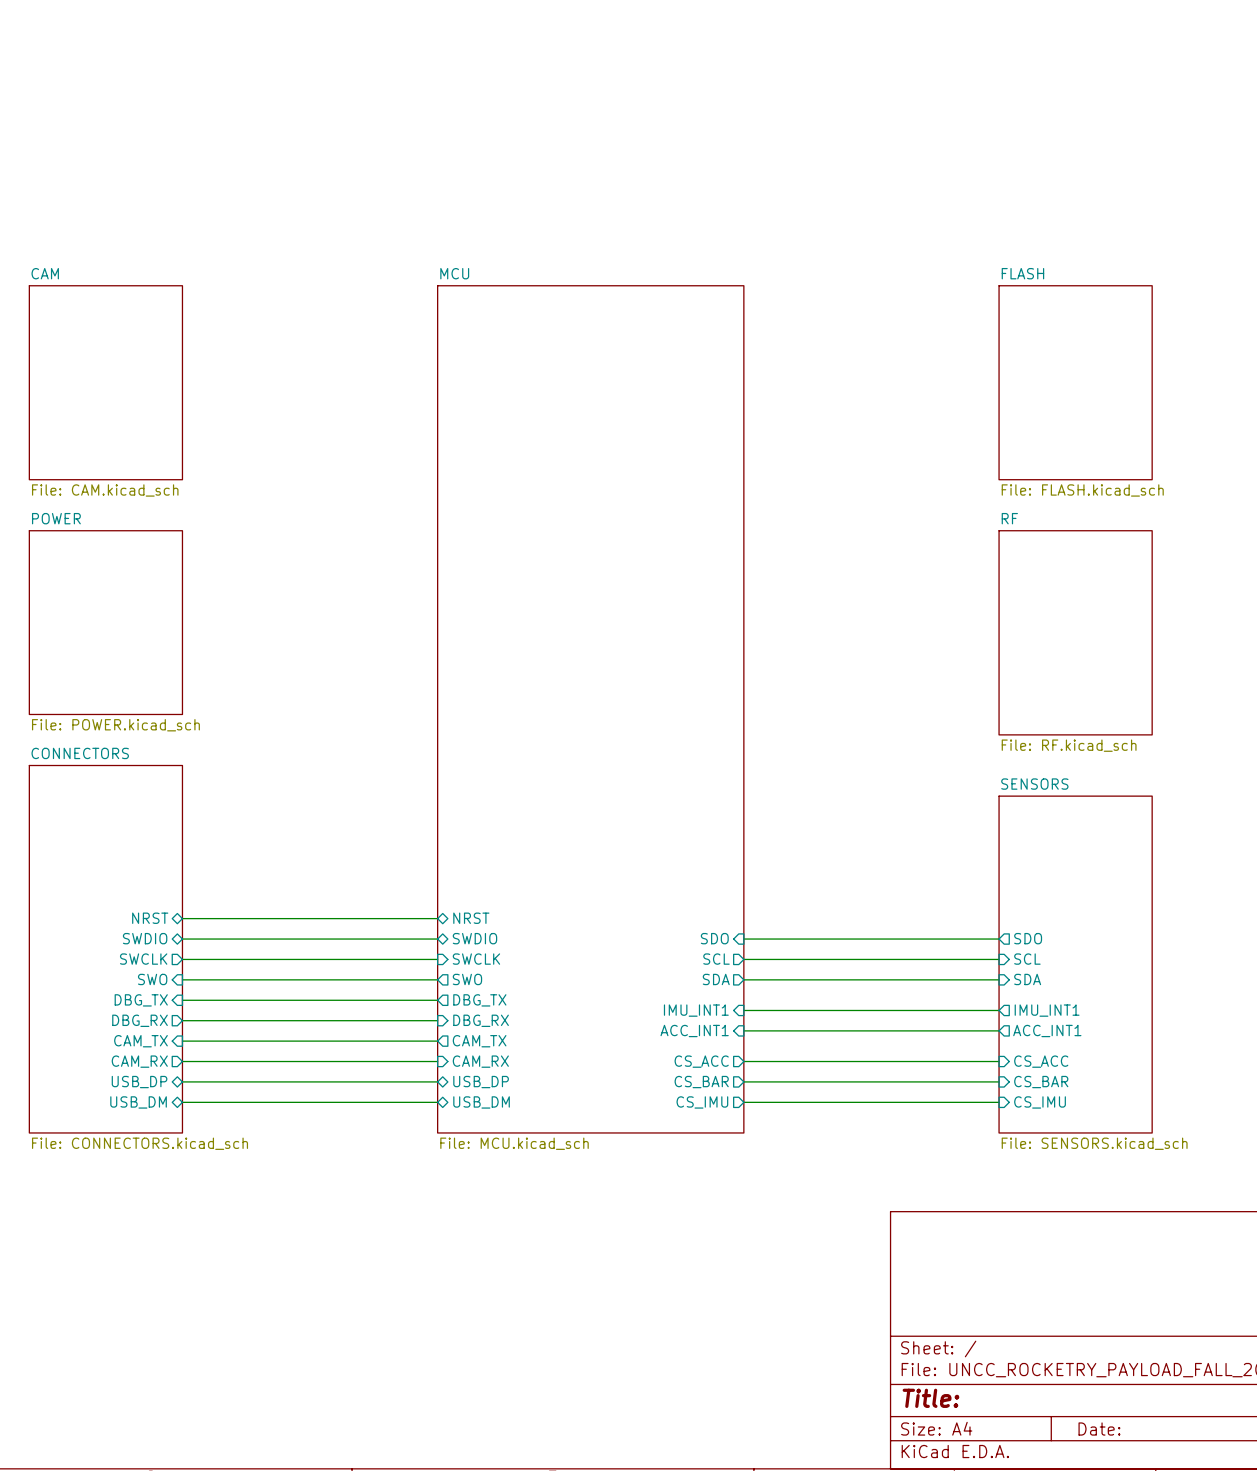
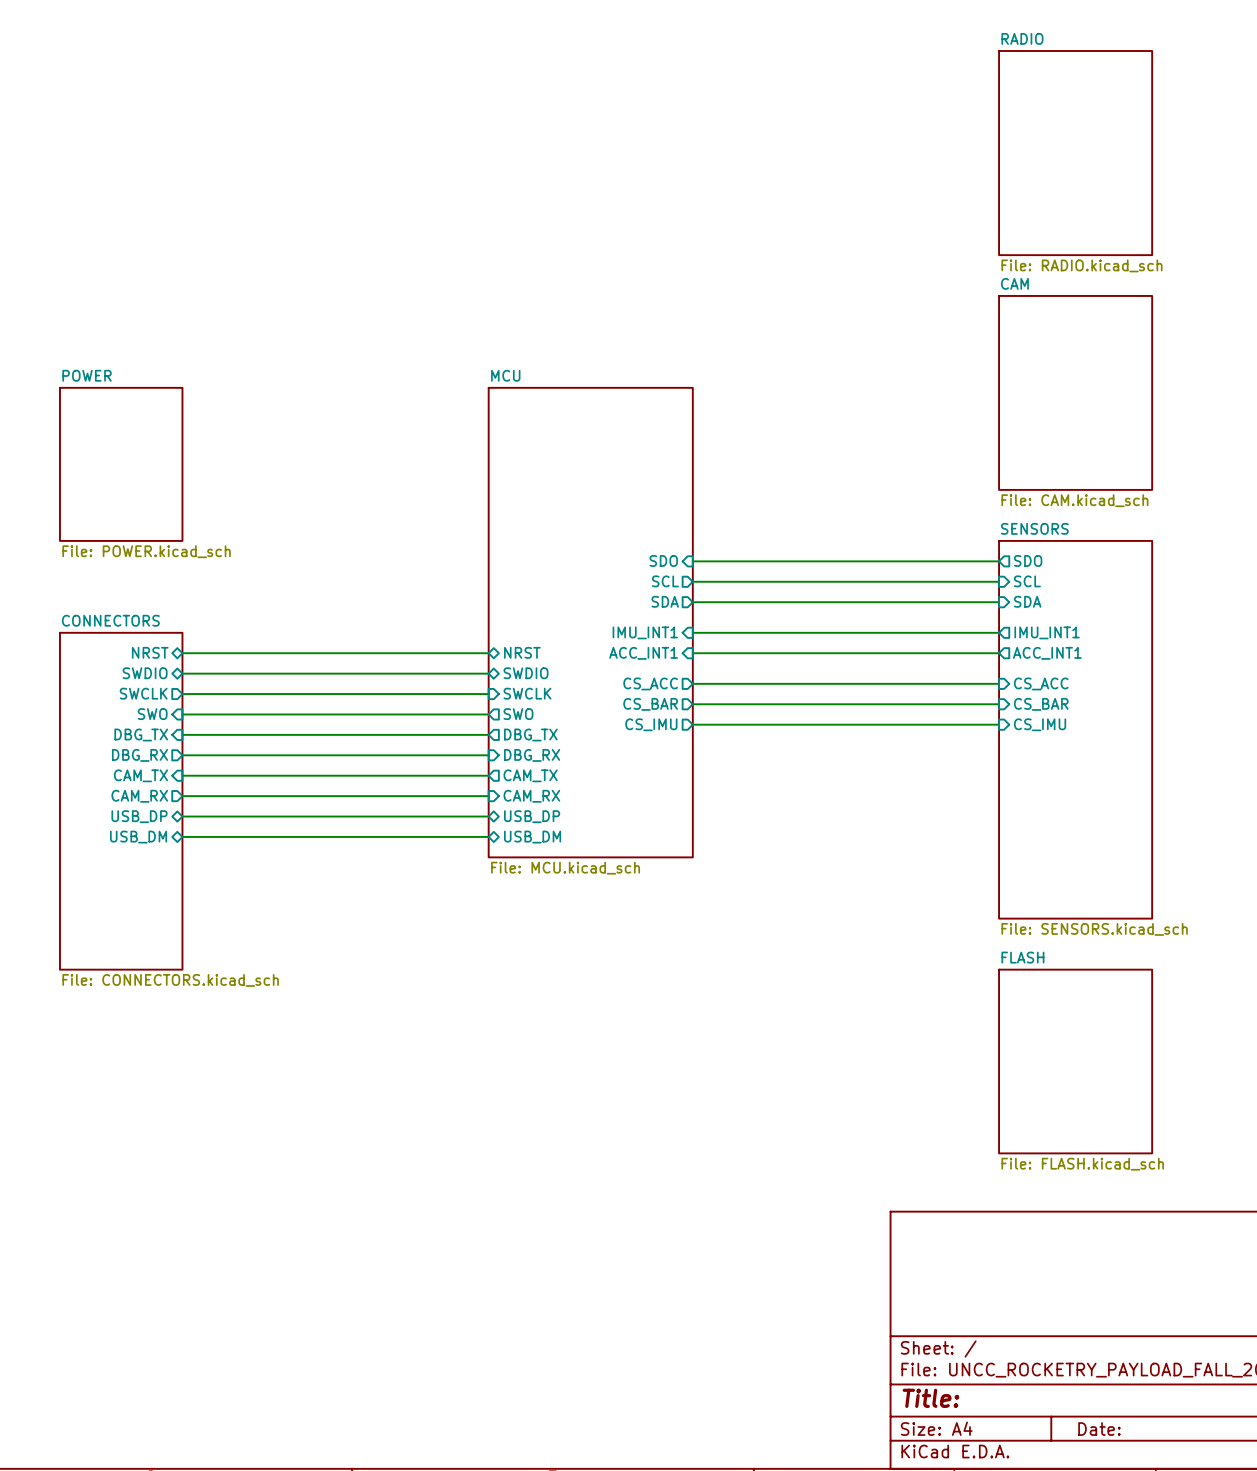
sheet RADIO: none -> File: RADIO.kicad_sch (1075, 153)
sheet CAM: File: CAM.kicad_sch (105, 382) -> none
sheet FLASH: File: FLASH.kicad_sch (1075, 382) -> none
sheet CAM: none -> File: CAM.kicad_sch (1075, 392)
sheet POWER: none -> File: POWER.kicad_sch (121, 464)
sheet pin: none -> SDO (663, 560)
sheet pin: none -> SDO (1028, 560)
wire: none -> (692, 561) (999, 561)
sheet pin: none -> SCL (665, 581)
wire: none -> (692, 581) (999, 581)
sheet pin: none -> SCL (1027, 581)
sheet pin: none -> SDA (665, 601)
sheet pin: none -> SDA (1027, 601)
wire: none -> (692, 602) (999, 602)
sheet POWER: File: POWER.kicad_sch (105, 622) -> none
sheet MCU: none -> File: MCU.kicad_sch (590, 622)
sheet pin: none -> IMU_INT1 (645, 632)
wire: none -> (692, 632) (999, 632)
sheet pin: none -> IMU_INT1 (1047, 632)
sheet RF: File: RF.kicad_sch (1075, 632) -> none
sheet pin: none -> NRST (150, 652)
sheet pin: none -> NRST (522, 652)
wire: none -> (182, 653) (488, 653)
sheet pin: none -> ACC_INT1 (643, 653)
wire: none -> (692, 653) (999, 653)
sheet pin: none -> ACC_INT1 (1047, 653)
sheet pin: none -> SWDIO (145, 673)
wire: none -> (182, 673) (488, 673)
sheet pin: none -> SWDIO (526, 673)
sheet pin: none -> CS_ACC (650, 683)
wire: none -> (692, 683) (999, 683)
sheet pin: none -> CS_ACC (1041, 683)
sheet pin: none -> SWCLK (143, 693)
sheet pin: none -> SWCLK (527, 693)
wire: none -> (182, 694) (488, 694)
sheet pin: none -> CS_BAR (650, 704)
wire: none -> (692, 704) (999, 704)
sheet pin: none -> CS_BAR (1041, 704)
sheet MCU: File: MCU.kicad_sch (590, 709) -> none
sheet pin: none -> SWO (152, 714)
wire: none -> (182, 714) (488, 714)
sheet pin: none -> SWO (518, 714)
sheet pin: none -> CS_IMU (651, 724)
wire: none -> (692, 724) (999, 724)
sheet pin: none -> CS_IMU (1040, 724)
sheet SENSORS: none -> File: SENSORS.kicad_sch (1075, 729)
sheet pin: none -> DBG_TX (141, 734)
wire: none -> (182, 734) (488, 734)
sheet pin: none -> DBG_TX (530, 734)
sheet pin: none -> DBG_RX (140, 755)
wire: none -> (182, 755) (488, 755)
sheet pin: none -> DBG_RX (532, 755)
sheet pin: none -> CAM_TX (140, 775)
wire: none -> (182, 775) (488, 775)
sheet pin: none -> CAM_TX (530, 775)
sheet pin: none -> CAM_RX (139, 796)
wire: none -> (182, 796) (488, 796)
sheet pin: none -> CAM_RX (531, 796)
sheet CONNECTORS: none -> File: CONNECTORS.kicad_sch (121, 801)
sheet pin: none -> USB_DP (139, 816)
wire: none -> (182, 816) (488, 816)
sheet pin: none -> USB_DP (532, 816)
wire: none -> (182, 836) (488, 836)
sheet pin: none -> USB_DM (138, 837)
sheet pin: none -> USB_DM (532, 837)
sheet pin: NRST (150, 918) -> none
wire: (182, 918) (437, 918) -> none
sheet pin: NRST (471, 918) -> none
sheet pin: SWDIO (145, 938) -> none
sheet pin: SWDIO (474, 938) -> none
sheet pin: SDO (714, 938) -> none
sheet pin: SDO (1028, 938) -> none
wire: (182, 939) (437, 939) -> none
wire: (743, 939) (999, 939) -> none
sheet CONNECTORS: File: CONNECTORS.kicad_sch (105, 949) -> none
sheet pin: SWCLK (143, 959) -> none
wire: (182, 959) (437, 959) -> none
sheet pin: SWCLK (476, 959) -> none
sheet pin: SCL (716, 959) -> none
wire: (743, 959) (999, 959) -> none
sheet pin: SCL (1027, 959) -> none
sheet SENSORS: File: SENSORS.kicad_sch (1075, 964) -> none
sheet pin: SWO (152, 979) -> none
wire: (182, 979) (437, 979) -> none
sheet pin: SWO (467, 979) -> none
sheet pin: SDA (716, 979) -> none
wire: (743, 979) (999, 979) -> none
sheet pin: SDA (1027, 979) -> none
sheet pin: DBG_TX (141, 1000) -> none
wire: (182, 1000) (437, 1000) -> none
sheet pin: DBG_TX (479, 1000) -> none
sheet pin: IMU_INT1 (696, 1010) -> none
wire: (743, 1010) (999, 1010) -> none
sheet pin: IMU_INT1 (1047, 1010) -> none
sheet pin: DBG_RX (140, 1020) -> none
wire: (182, 1020) (437, 1020) -> none
sheet pin: DBG_RX (481, 1020) -> none
wire: (743, 1030) (999, 1030) -> none
sheet pin: ACC_INT1 (694, 1031) -> none
sheet pin: ACC_INT1 (1047, 1031) -> none
sheet pin: CAM_TX (140, 1041) -> none
wire: (182, 1041) (437, 1041) -> none
sheet pin: CAM_TX (479, 1041) -> none
sheet pin: CAM_RX (139, 1061) -> none
wire: (182, 1061) (437, 1061) -> none
sheet pin: CAM_RX (480, 1061) -> none
sheet pin: CS_ACC (701, 1061) -> none
wire: (743, 1061) (999, 1061) -> none
sheet pin: CS_ACC (1041, 1061) -> none
sheet FLASH: none -> File: FLASH.kicad_sch (1075, 1061)
wire: (182, 1081) (437, 1081) -> none
wire: (743, 1081) (999, 1081) -> none
sheet pin: USB_DP (139, 1082) -> none
sheet pin: USB_DP (481, 1082) -> none
sheet pin: CS_BAR (701, 1082) -> none
sheet pin: CS_BAR (1041, 1082) -> none
sheet pin: USB_DM (138, 1102) -> none
wire: (182, 1102) (437, 1102) -> none
sheet pin: USB_DM (481, 1102) -> none
sheet pin: CS_IMU (702, 1102) -> none
wire: (743, 1102) (999, 1102) -> none
sheet pin: CS_IMU (1040, 1102) -> none

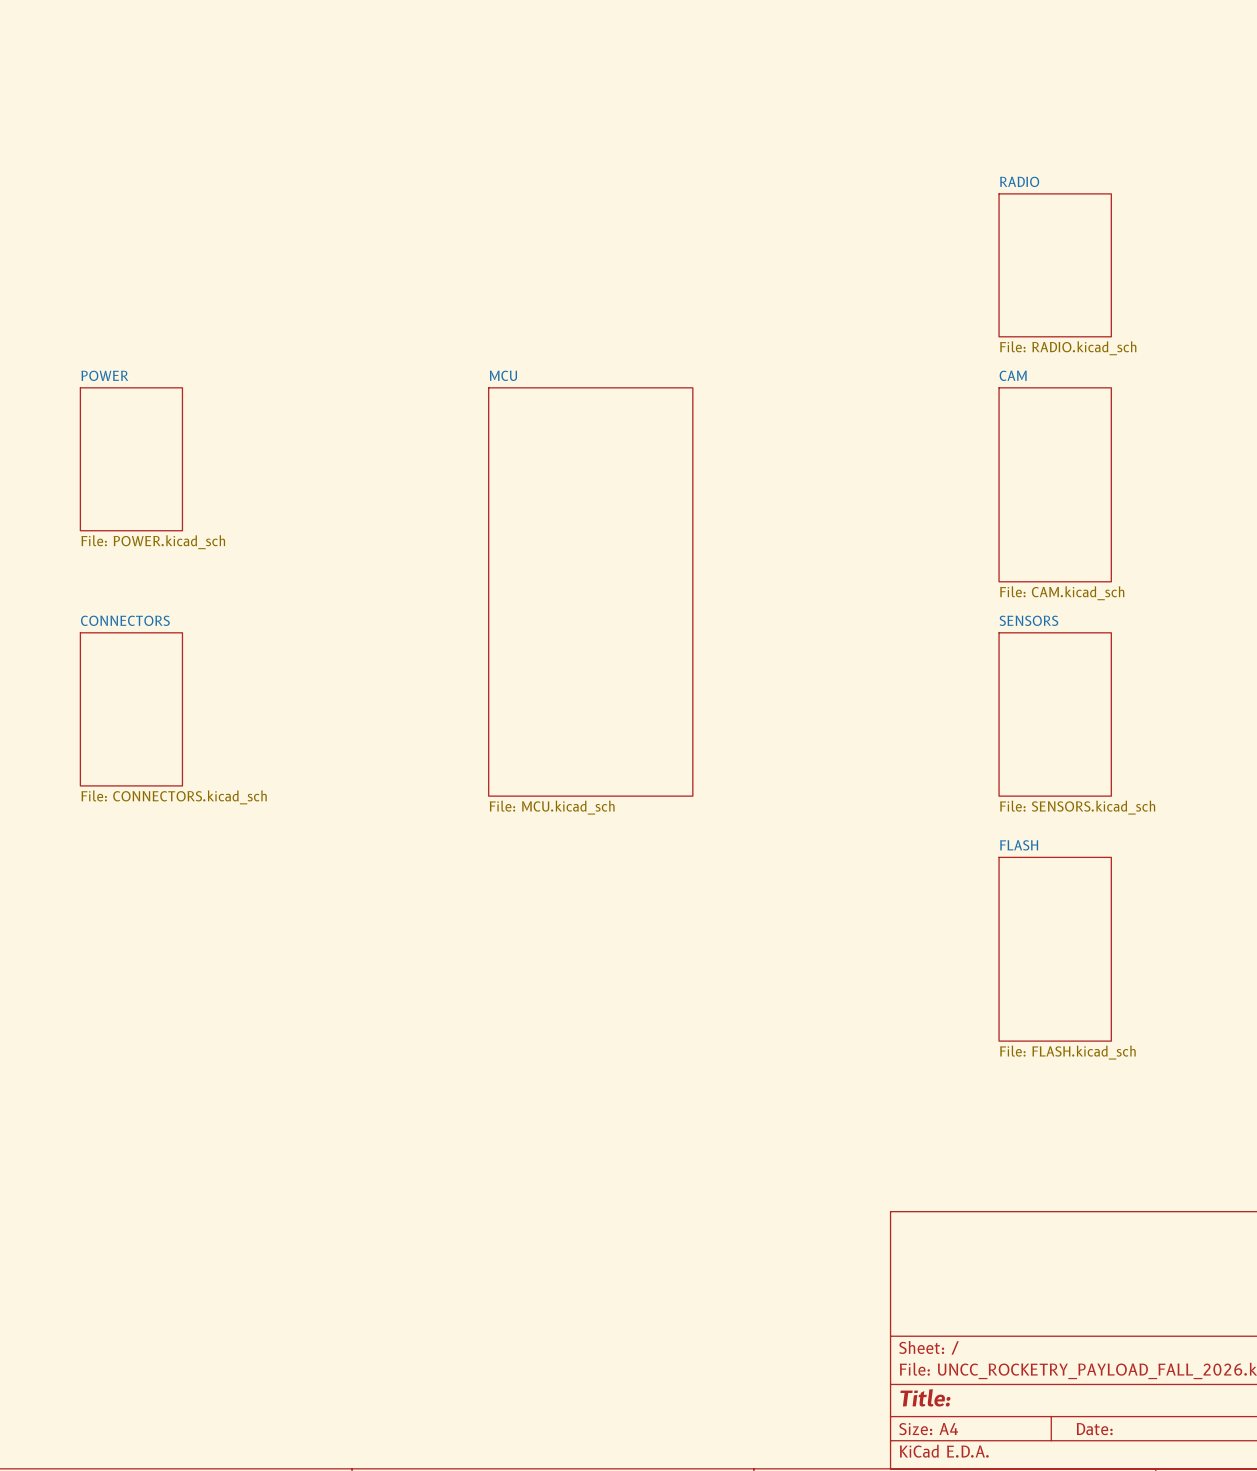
sheet RADIO: File: RADIO.kicad_sch (1075, 153) -> none
sheet RADIO: none -> File: RADIO.kicad_sch (1055, 265)
sheet CAM: File: CAM.kicad_sch (1075, 392) -> none
sheet POWER: none -> File: POWER.kicad_sch (131, 459)
sheet POWER: File: POWER.kicad_sch (121, 464) -> none
sheet CAM: none -> File: CAM.kicad_sch (1055, 484)
sheet pin: SDO (663, 560) -> none
sheet pin: SDO (1028, 560) -> none
wire: (692, 561) (999, 561) -> none
sheet pin: SCL (665, 581) -> none
wire: (692, 581) (999, 581) -> none
sheet pin: SCL (1027, 581) -> none
sheet MCU: none -> File: MCU.kicad_sch (590, 591)
sheet pin: SDA (665, 601) -> none
sheet pin: SDA (1027, 601) -> none
wire: (692, 602) (999, 602) -> none
sheet MCU: File: MCU.kicad_sch (590, 622) -> none
sheet pin: IMU_INT1 (645, 632) -> none
wire: (692, 632) (999, 632) -> none
sheet pin: IMU_INT1 (1047, 632) -> none
sheet pin: NRST (150, 652) -> none
sheet pin: NRST (522, 652) -> none
wire: (182, 653) (488, 653) -> none
sheet pin: ACC_INT1 (643, 653) -> none
wire: (692, 653) (999, 653) -> none
sheet pin: ACC_INT1 (1047, 653) -> none
sheet pin: SWDIO (145, 673) -> none
wire: (182, 673) (488, 673) -> none
sheet pin: SWDIO (526, 673) -> none
sheet pin: CS_ACC (650, 683) -> none
wire: (692, 683) (999, 683) -> none
sheet pin: CS_ACC (1041, 683) -> none
sheet pin: SWCLK (143, 693) -> none
sheet pin: SWCLK (527, 693) -> none
wire: (182, 694) (488, 694) -> none
sheet pin: CS_BAR (650, 704) -> none
wire: (692, 704) (999, 704) -> none
sheet pin: CS_BAR (1041, 704) -> none
sheet CONNECTORS: none -> File: CONNECTORS.kicad_sch (131, 709)
sheet pin: SWO (152, 714) -> none
wire: (182, 714) (488, 714) -> none
sheet pin: SWO (518, 714) -> none
sheet SENSORS: none -> File: SENSORS.kicad_sch (1055, 714)
sheet pin: CS_IMU (651, 724) -> none
wire: (692, 724) (999, 724) -> none
sheet pin: CS_IMU (1040, 724) -> none
sheet SENSORS: File: SENSORS.kicad_sch (1075, 729) -> none
sheet pin: DBG_TX (141, 734) -> none
wire: (182, 734) (488, 734) -> none
sheet pin: DBG_TX (530, 734) -> none
sheet pin: DBG_RX (140, 755) -> none
wire: (182, 755) (488, 755) -> none
sheet pin: DBG_RX (532, 755) -> none
sheet pin: CAM_TX (140, 775) -> none
wire: (182, 775) (488, 775) -> none
sheet pin: CAM_TX (530, 775) -> none
sheet pin: CAM_RX (139, 796) -> none
wire: (182, 796) (488, 796) -> none
sheet pin: CAM_RX (531, 796) -> none
sheet CONNECTORS: File: CONNECTORS.kicad_sch (121, 801) -> none
sheet pin: USB_DP (139, 816) -> none
wire: (182, 816) (488, 816) -> none
sheet pin: USB_DP (532, 816) -> none
wire: (182, 836) (488, 836) -> none
sheet pin: USB_DM (138, 837) -> none
sheet pin: USB_DM (532, 837) -> none
sheet FLASH: none -> File: FLASH.kicad_sch (1055, 949)
sheet FLASH: File: FLASH.kicad_sch (1075, 1061) -> none

